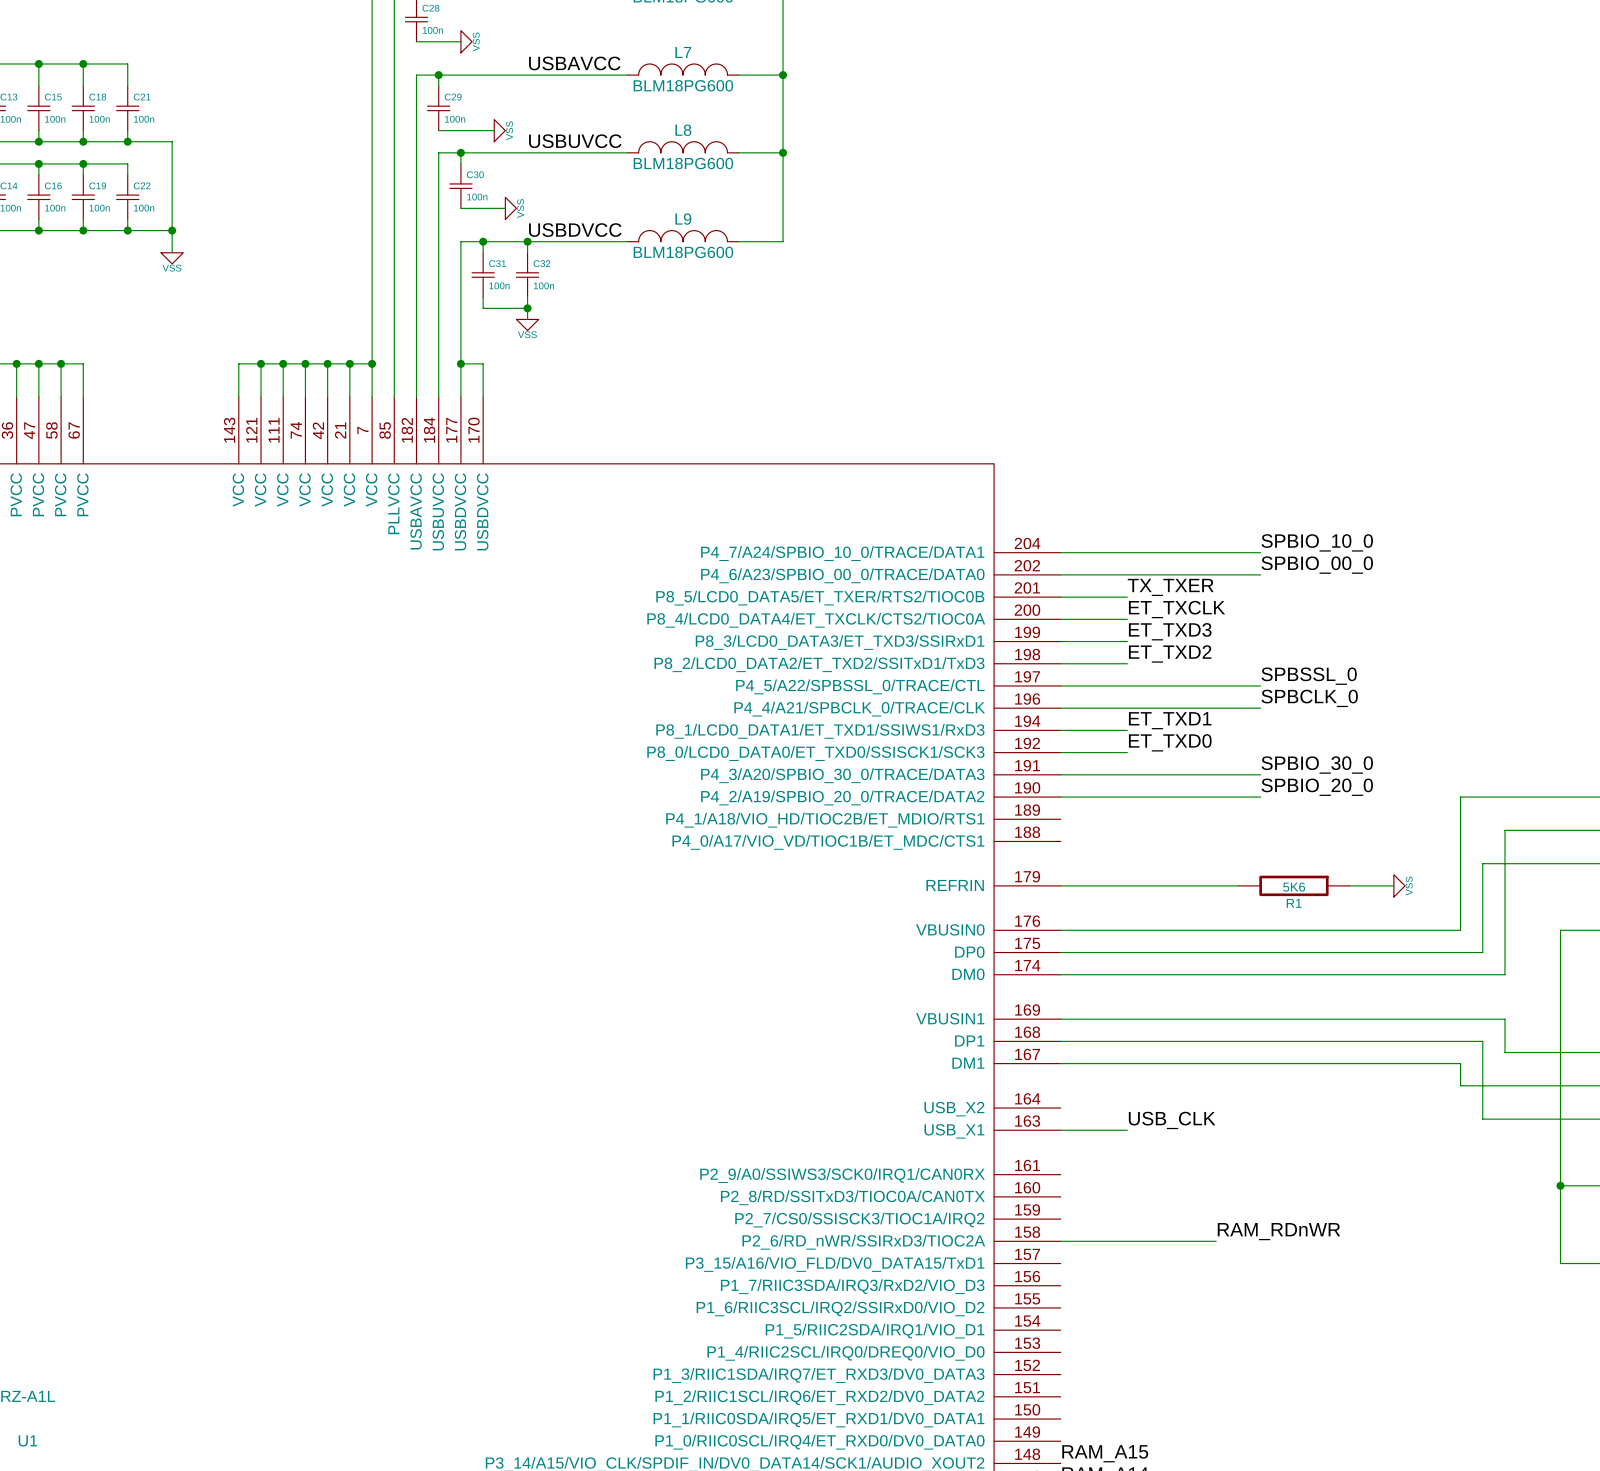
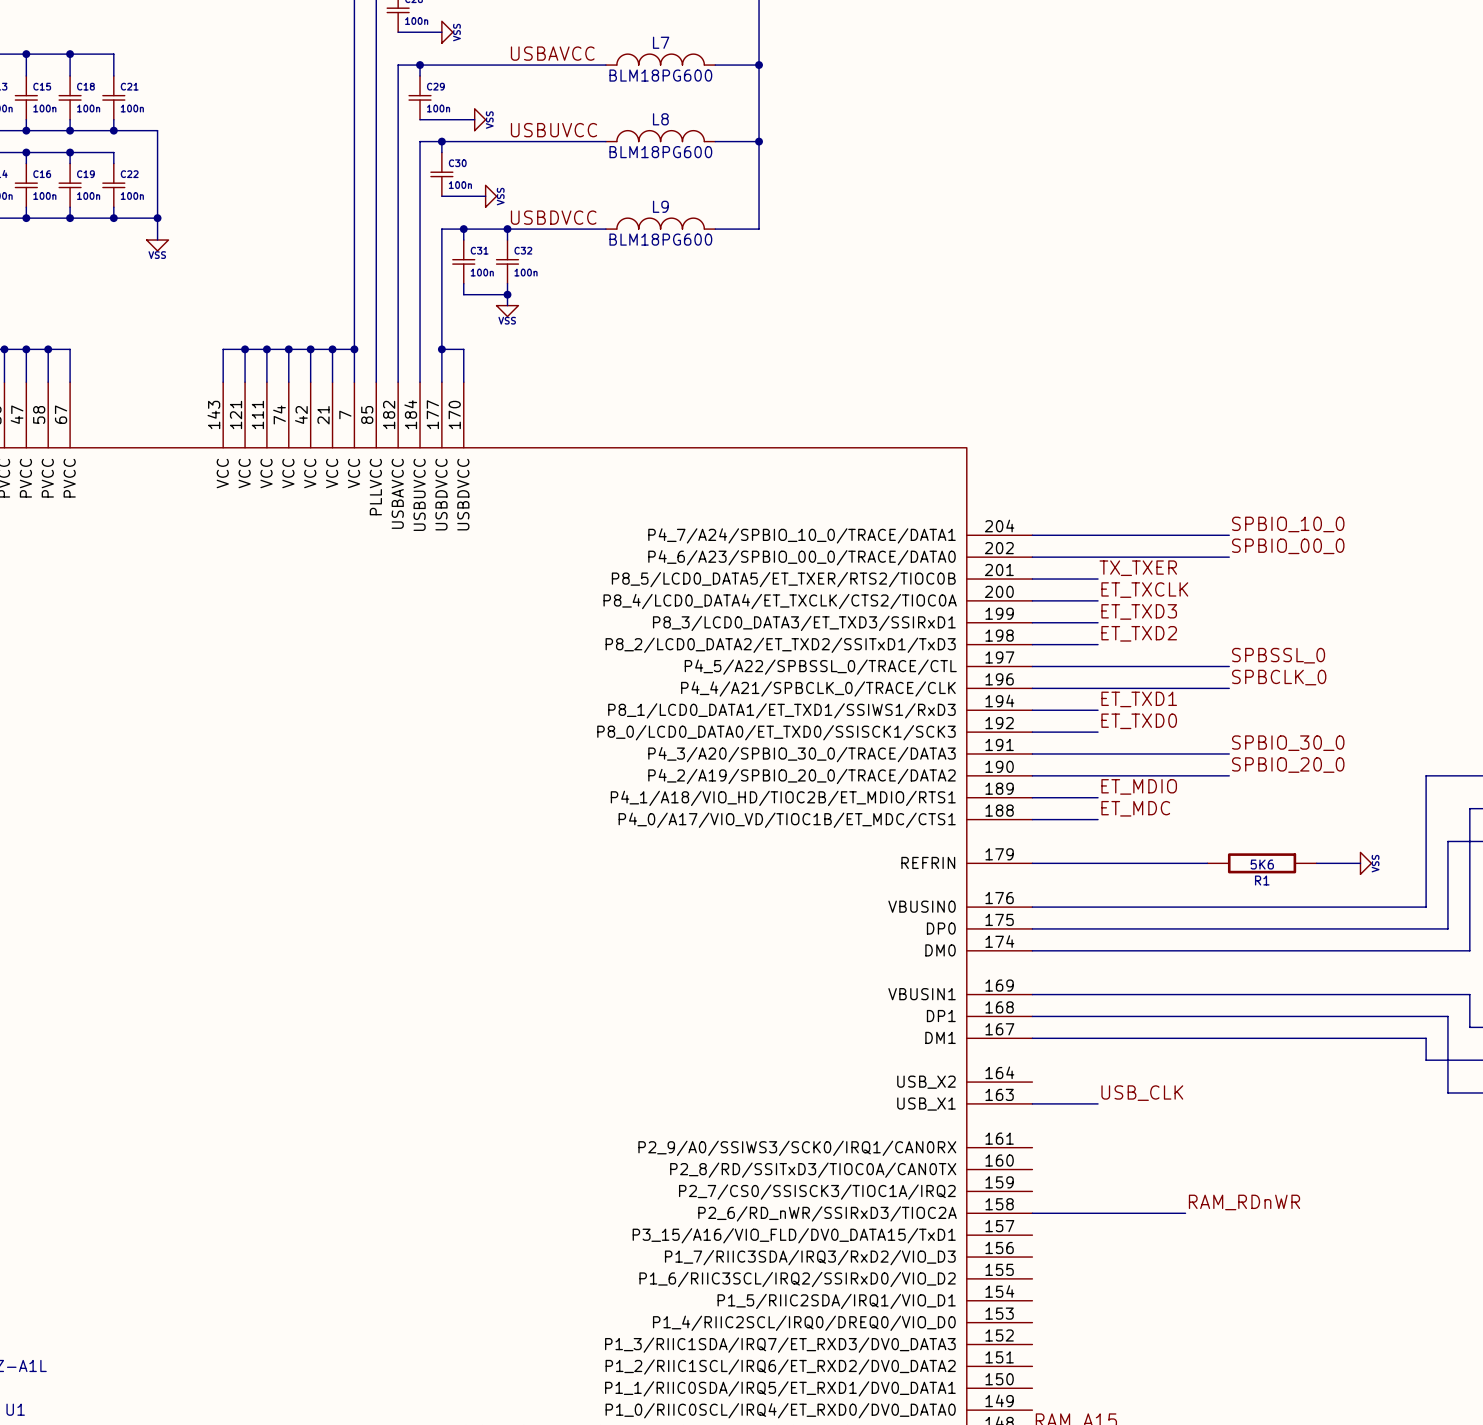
label: none -> ET_MDIO (1139, 786)
wire: none -> (1032, 797) (1098, 797)
label: none -> ET_MDC (1135, 808)
wire: none -> (1032, 819) (1098, 819)

